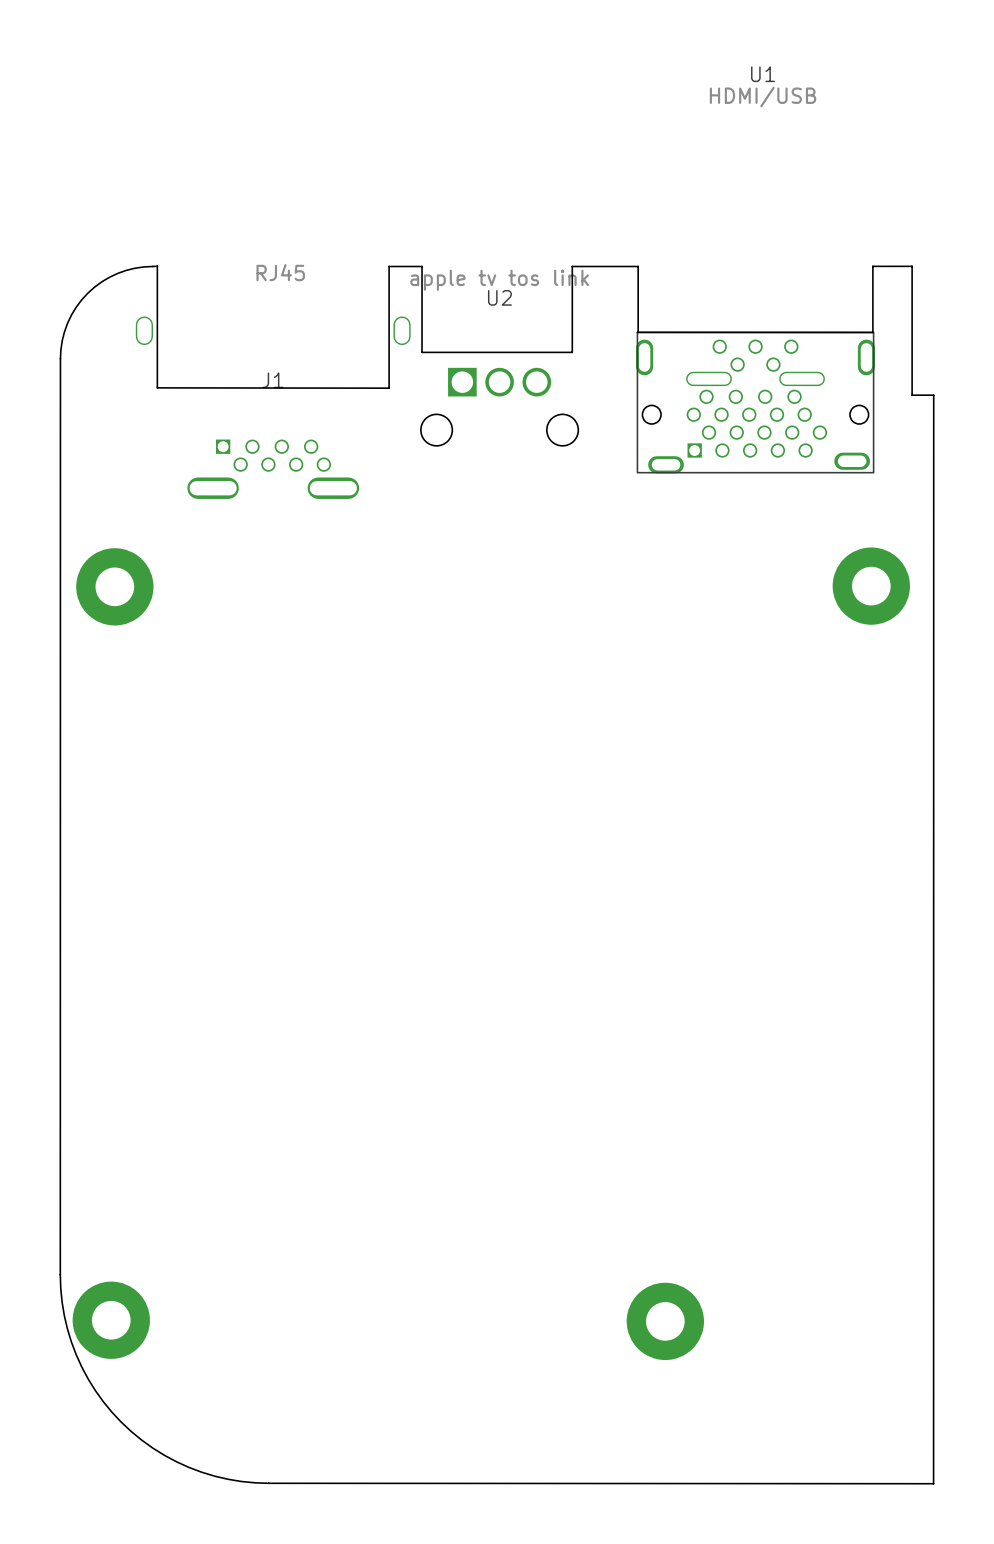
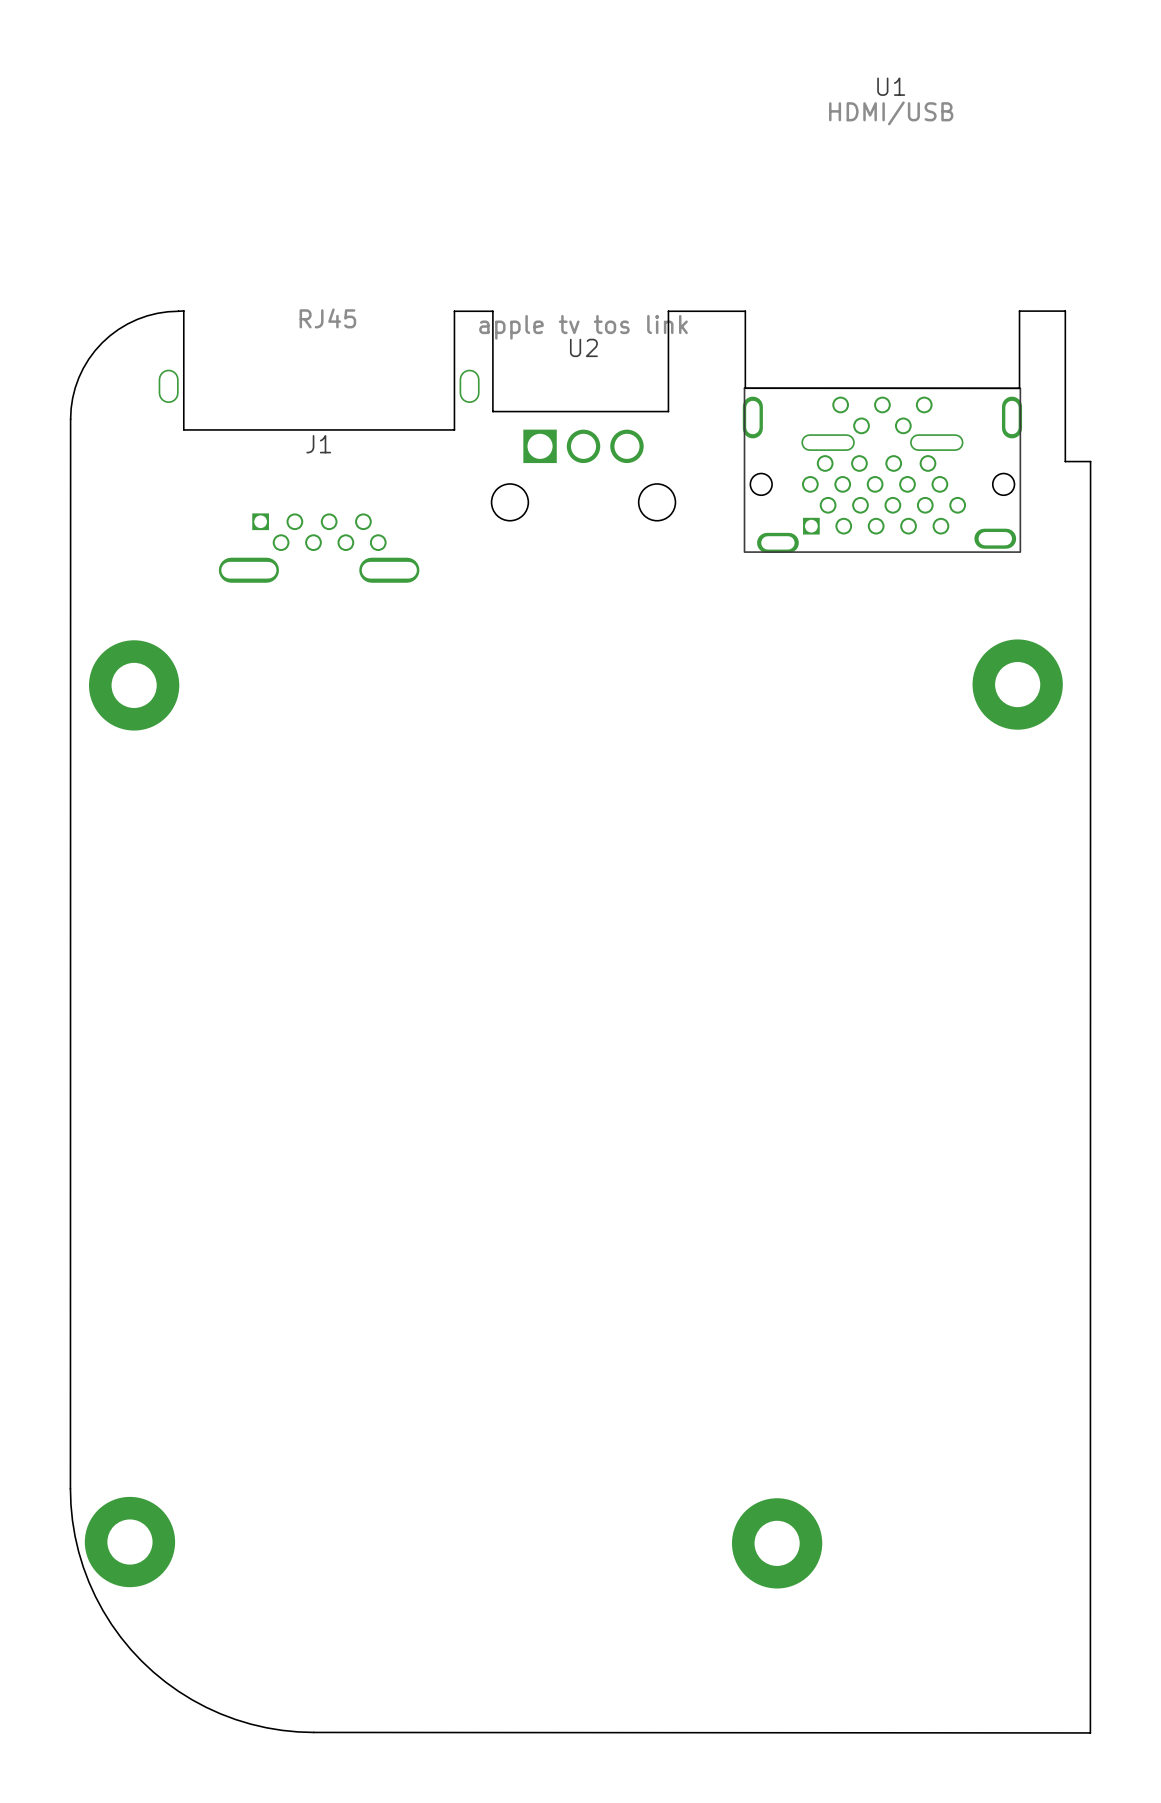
board edge: (157, 367) (157, 387) (389, 388) (389, 368) -> (183, 429) (454, 429)

